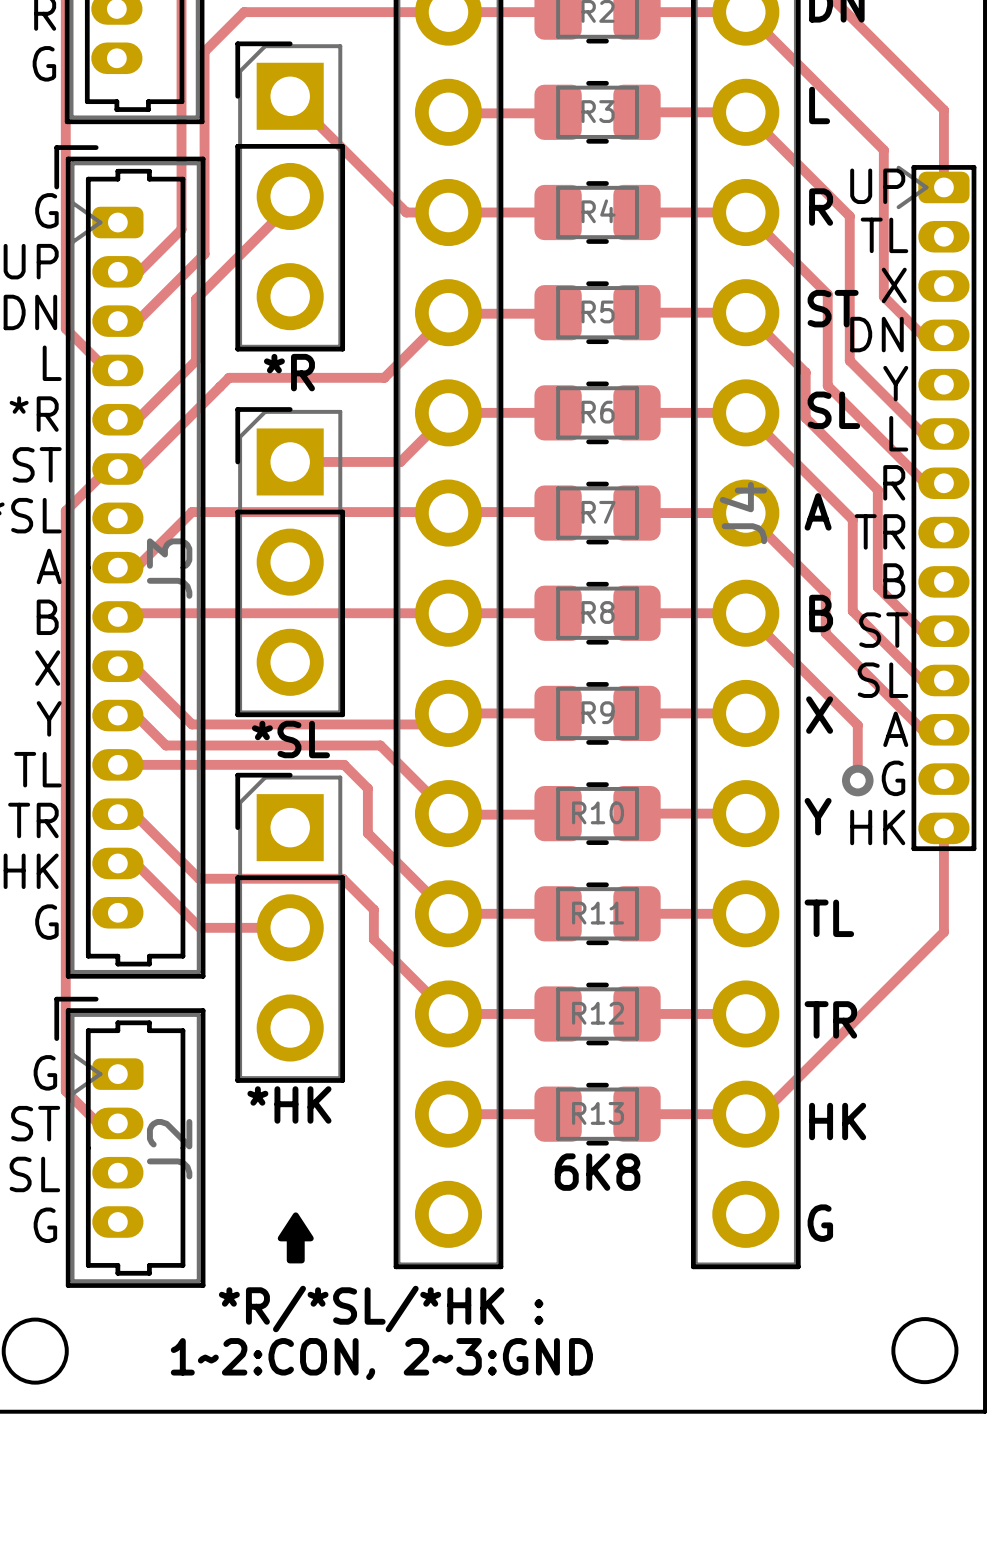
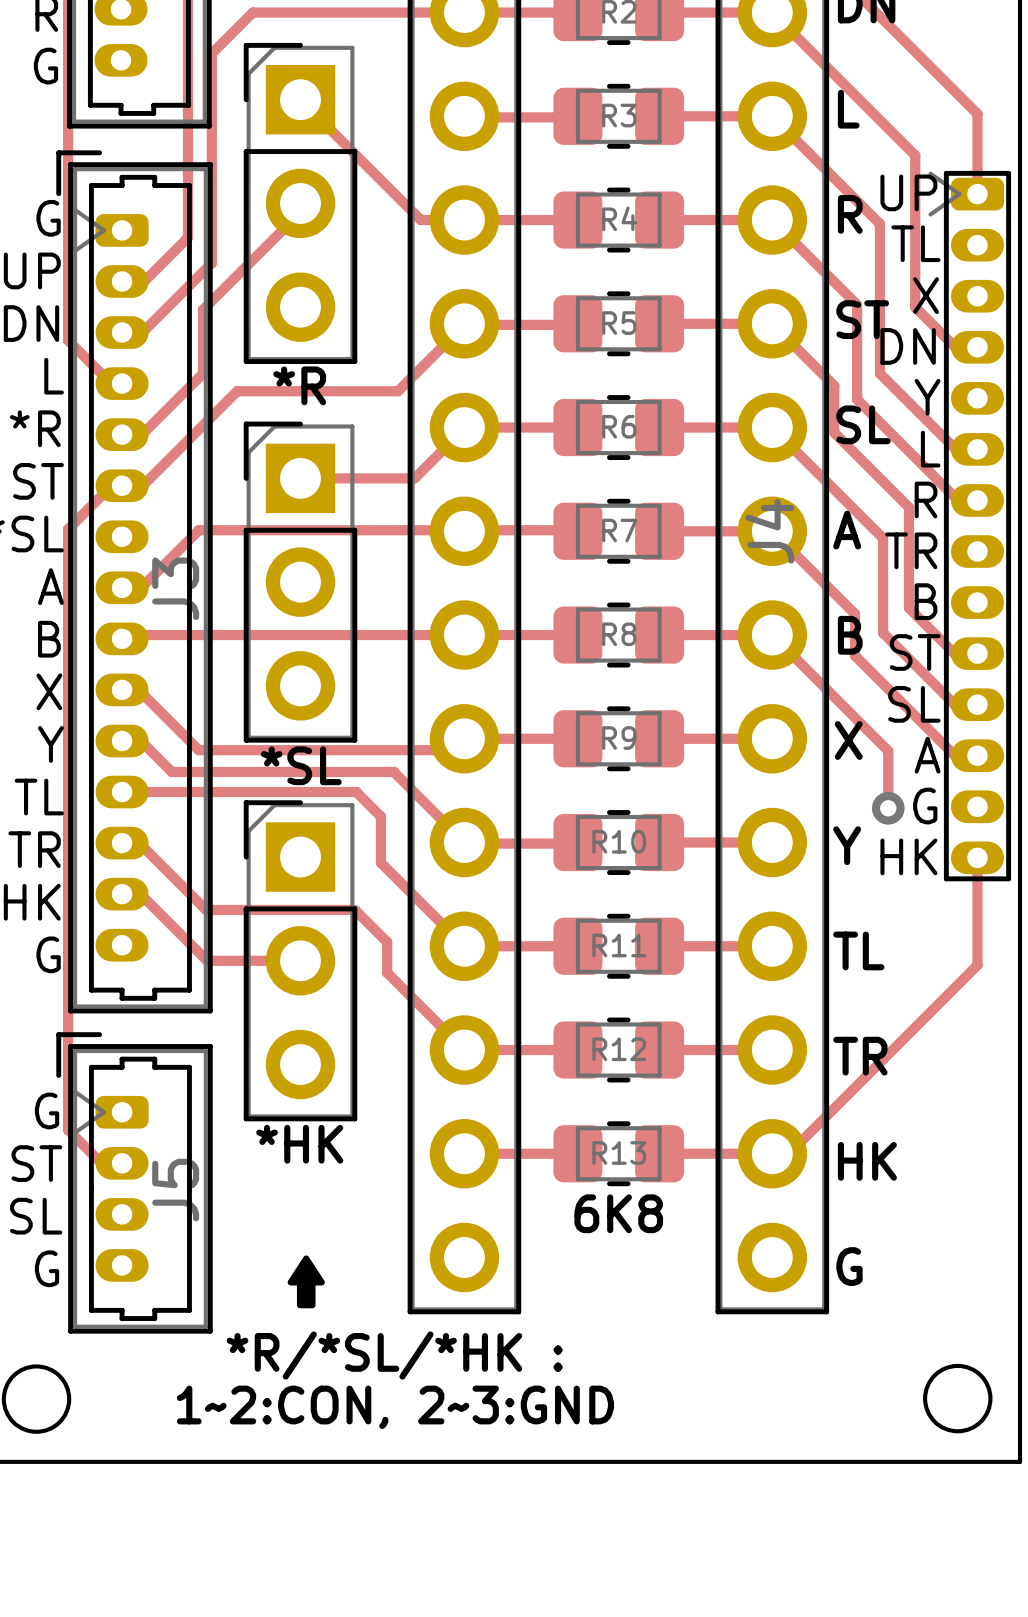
J2 name: J2 (169, 1149) -> J5 (175, 1190)

